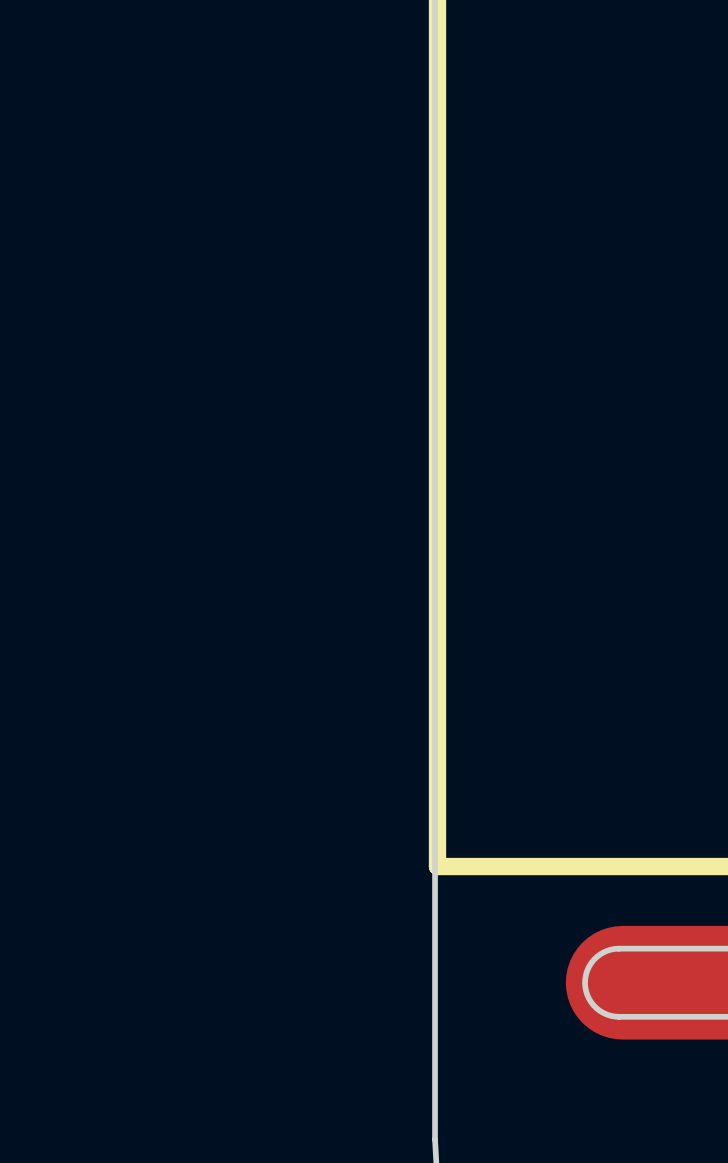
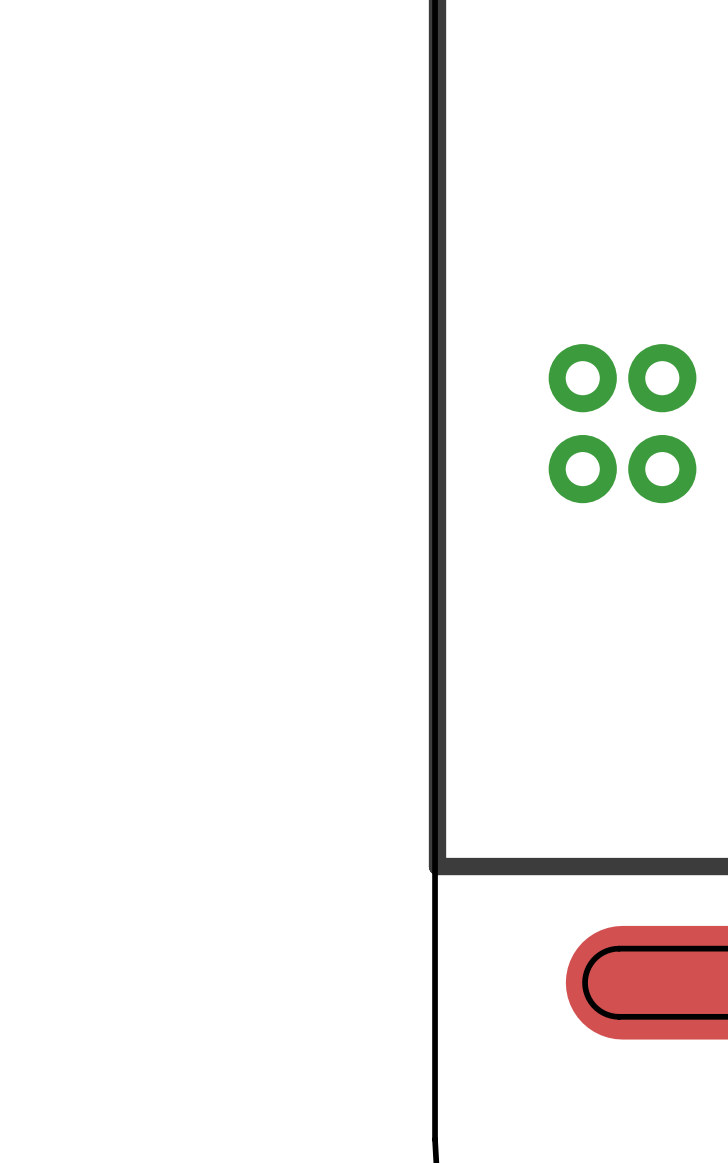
via: none -> (582, 378)
via: none -> (662, 378)
via: none -> (582, 469)
via: none -> (662, 469)

